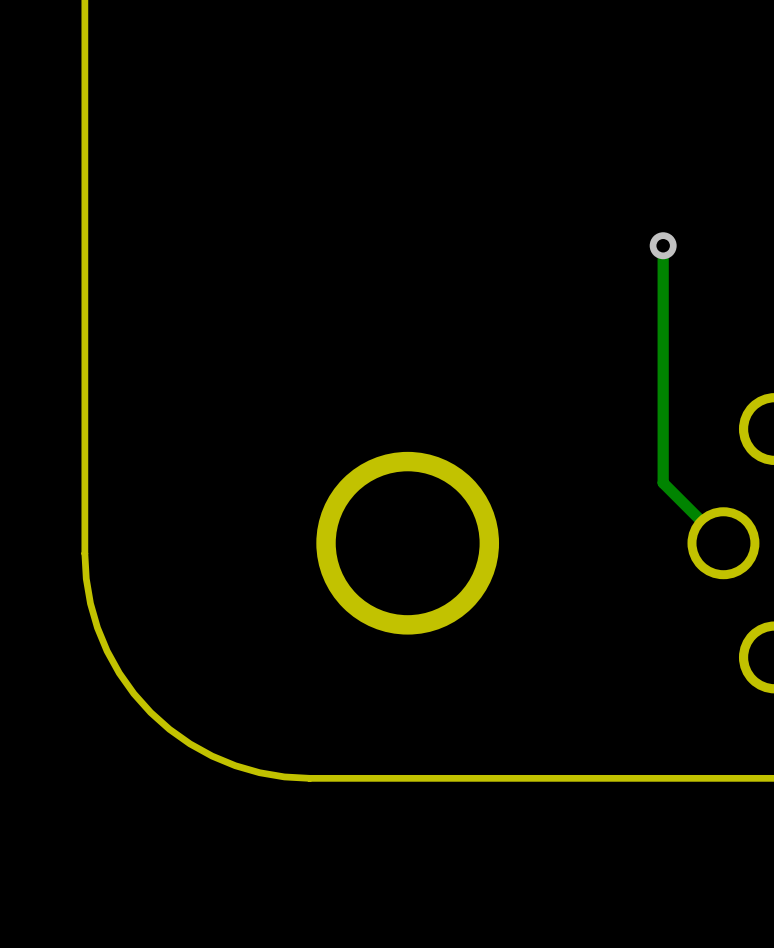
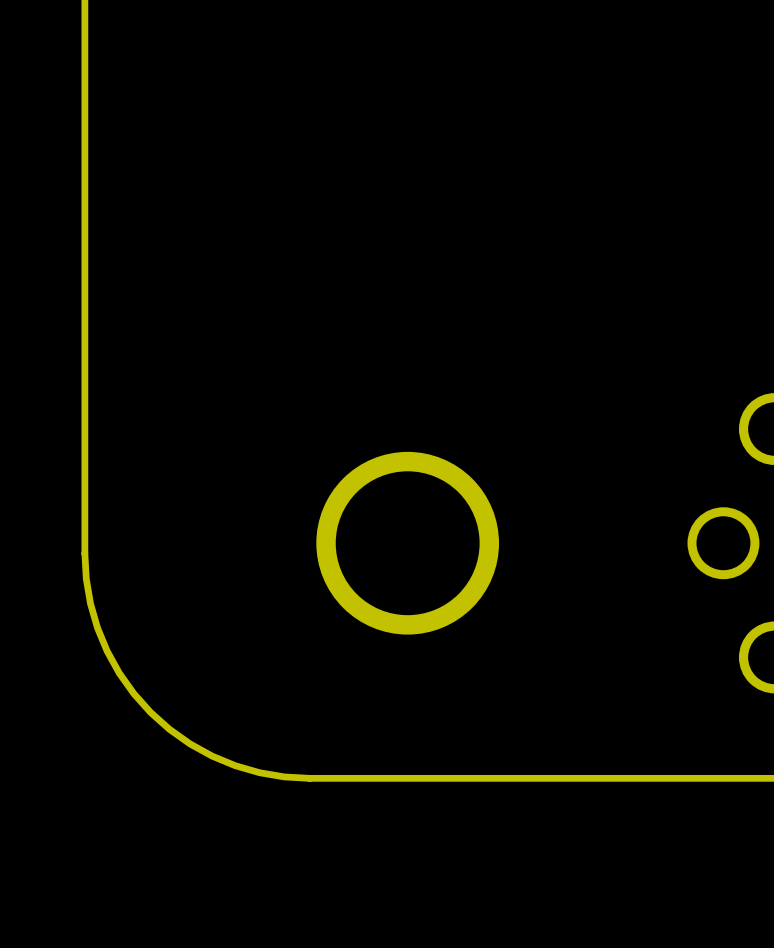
track: (663, 245) (663, 482) (723, 543) -> none
via: (663, 245) -> none

